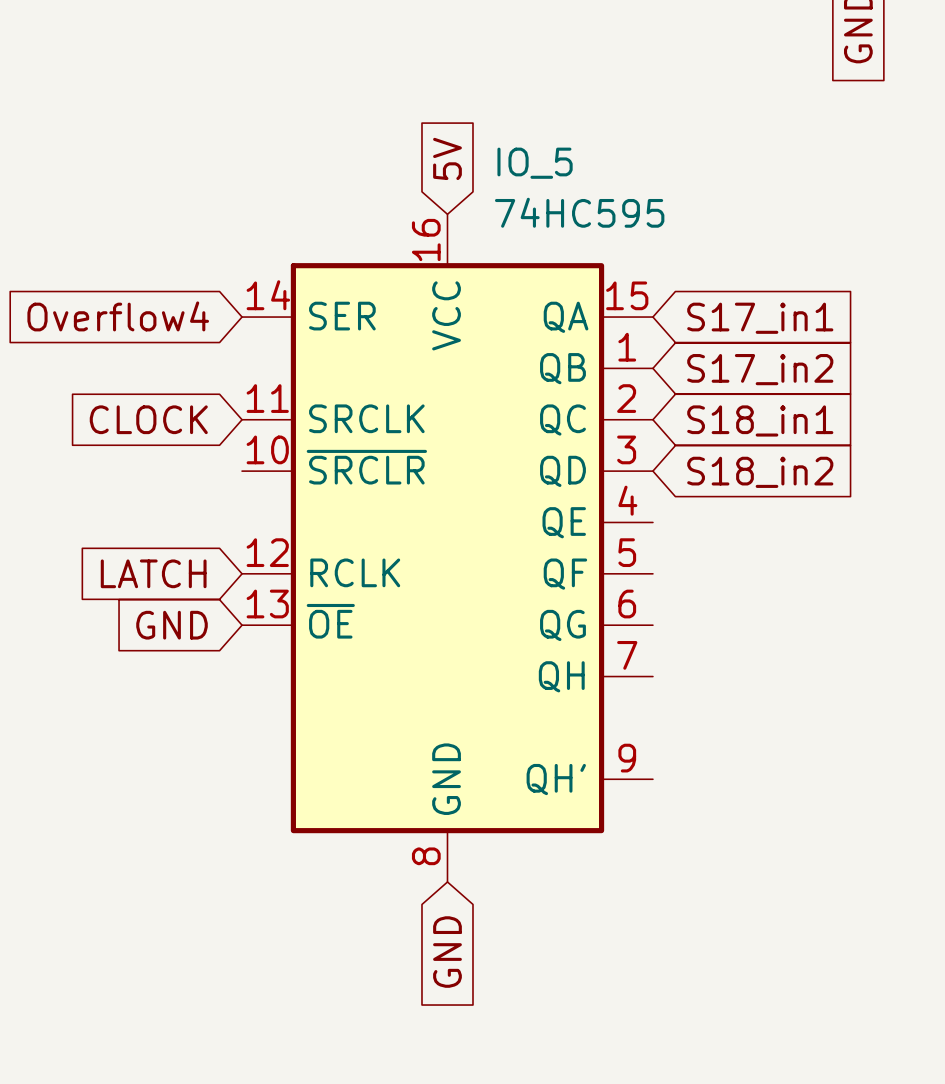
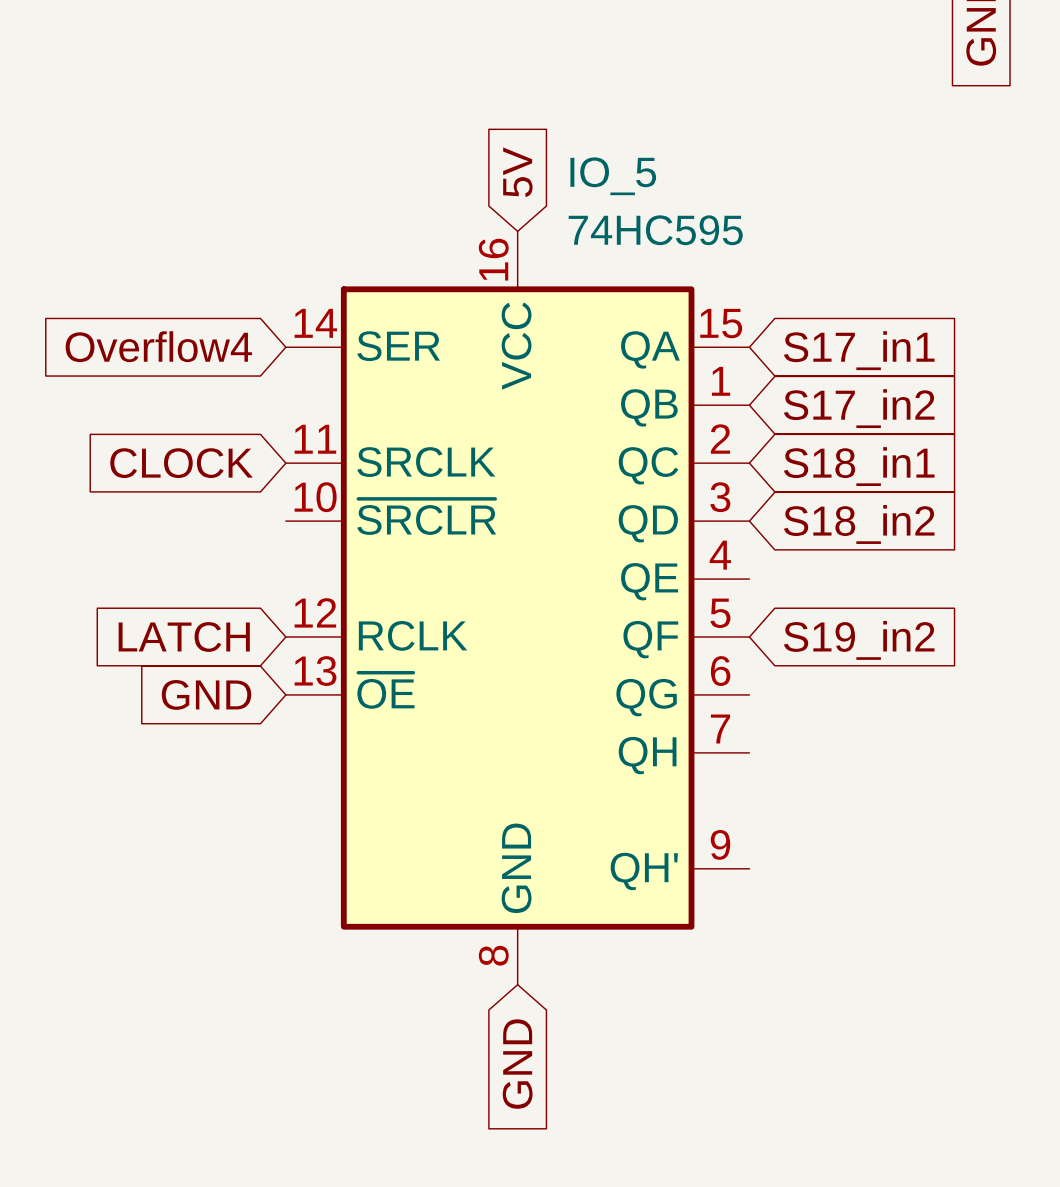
global label: none -> S19_in2 (859, 640)

